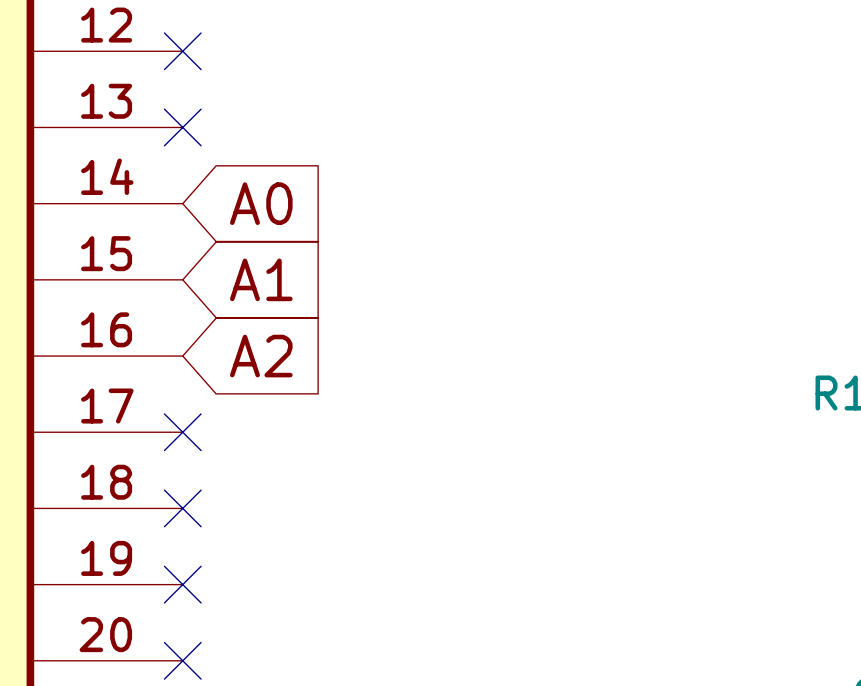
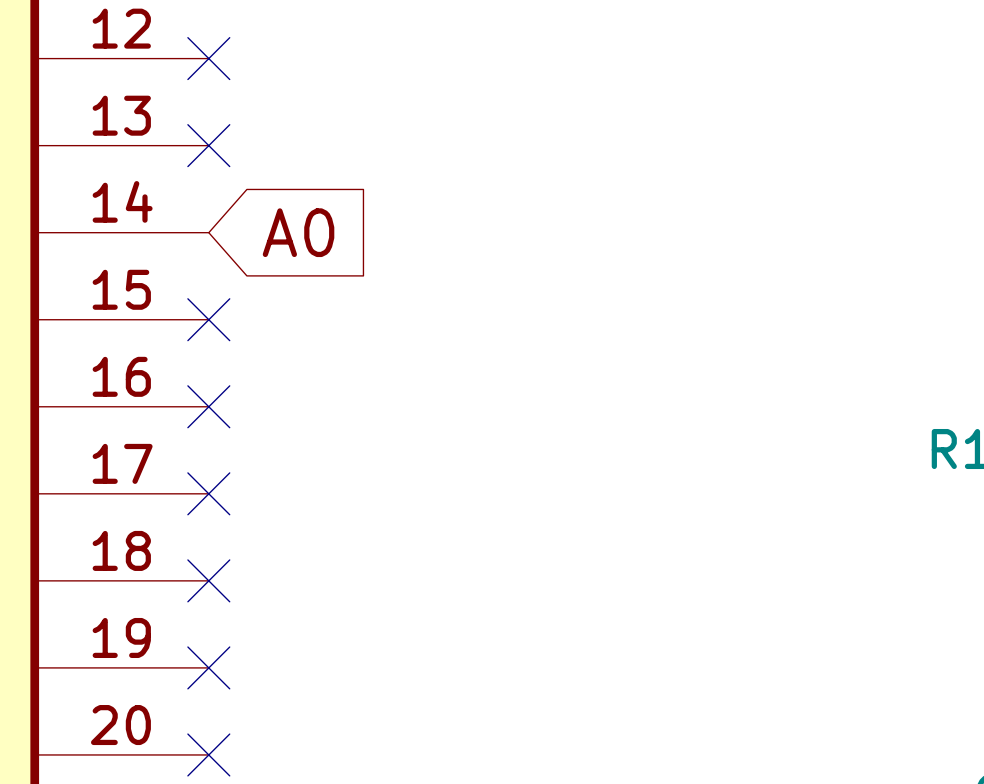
no-connect mark: none -> (208, 319)
global label: A1 (261, 279) -> none
no-connect mark: none -> (208, 406)
global label: A2 (261, 356) -> none

